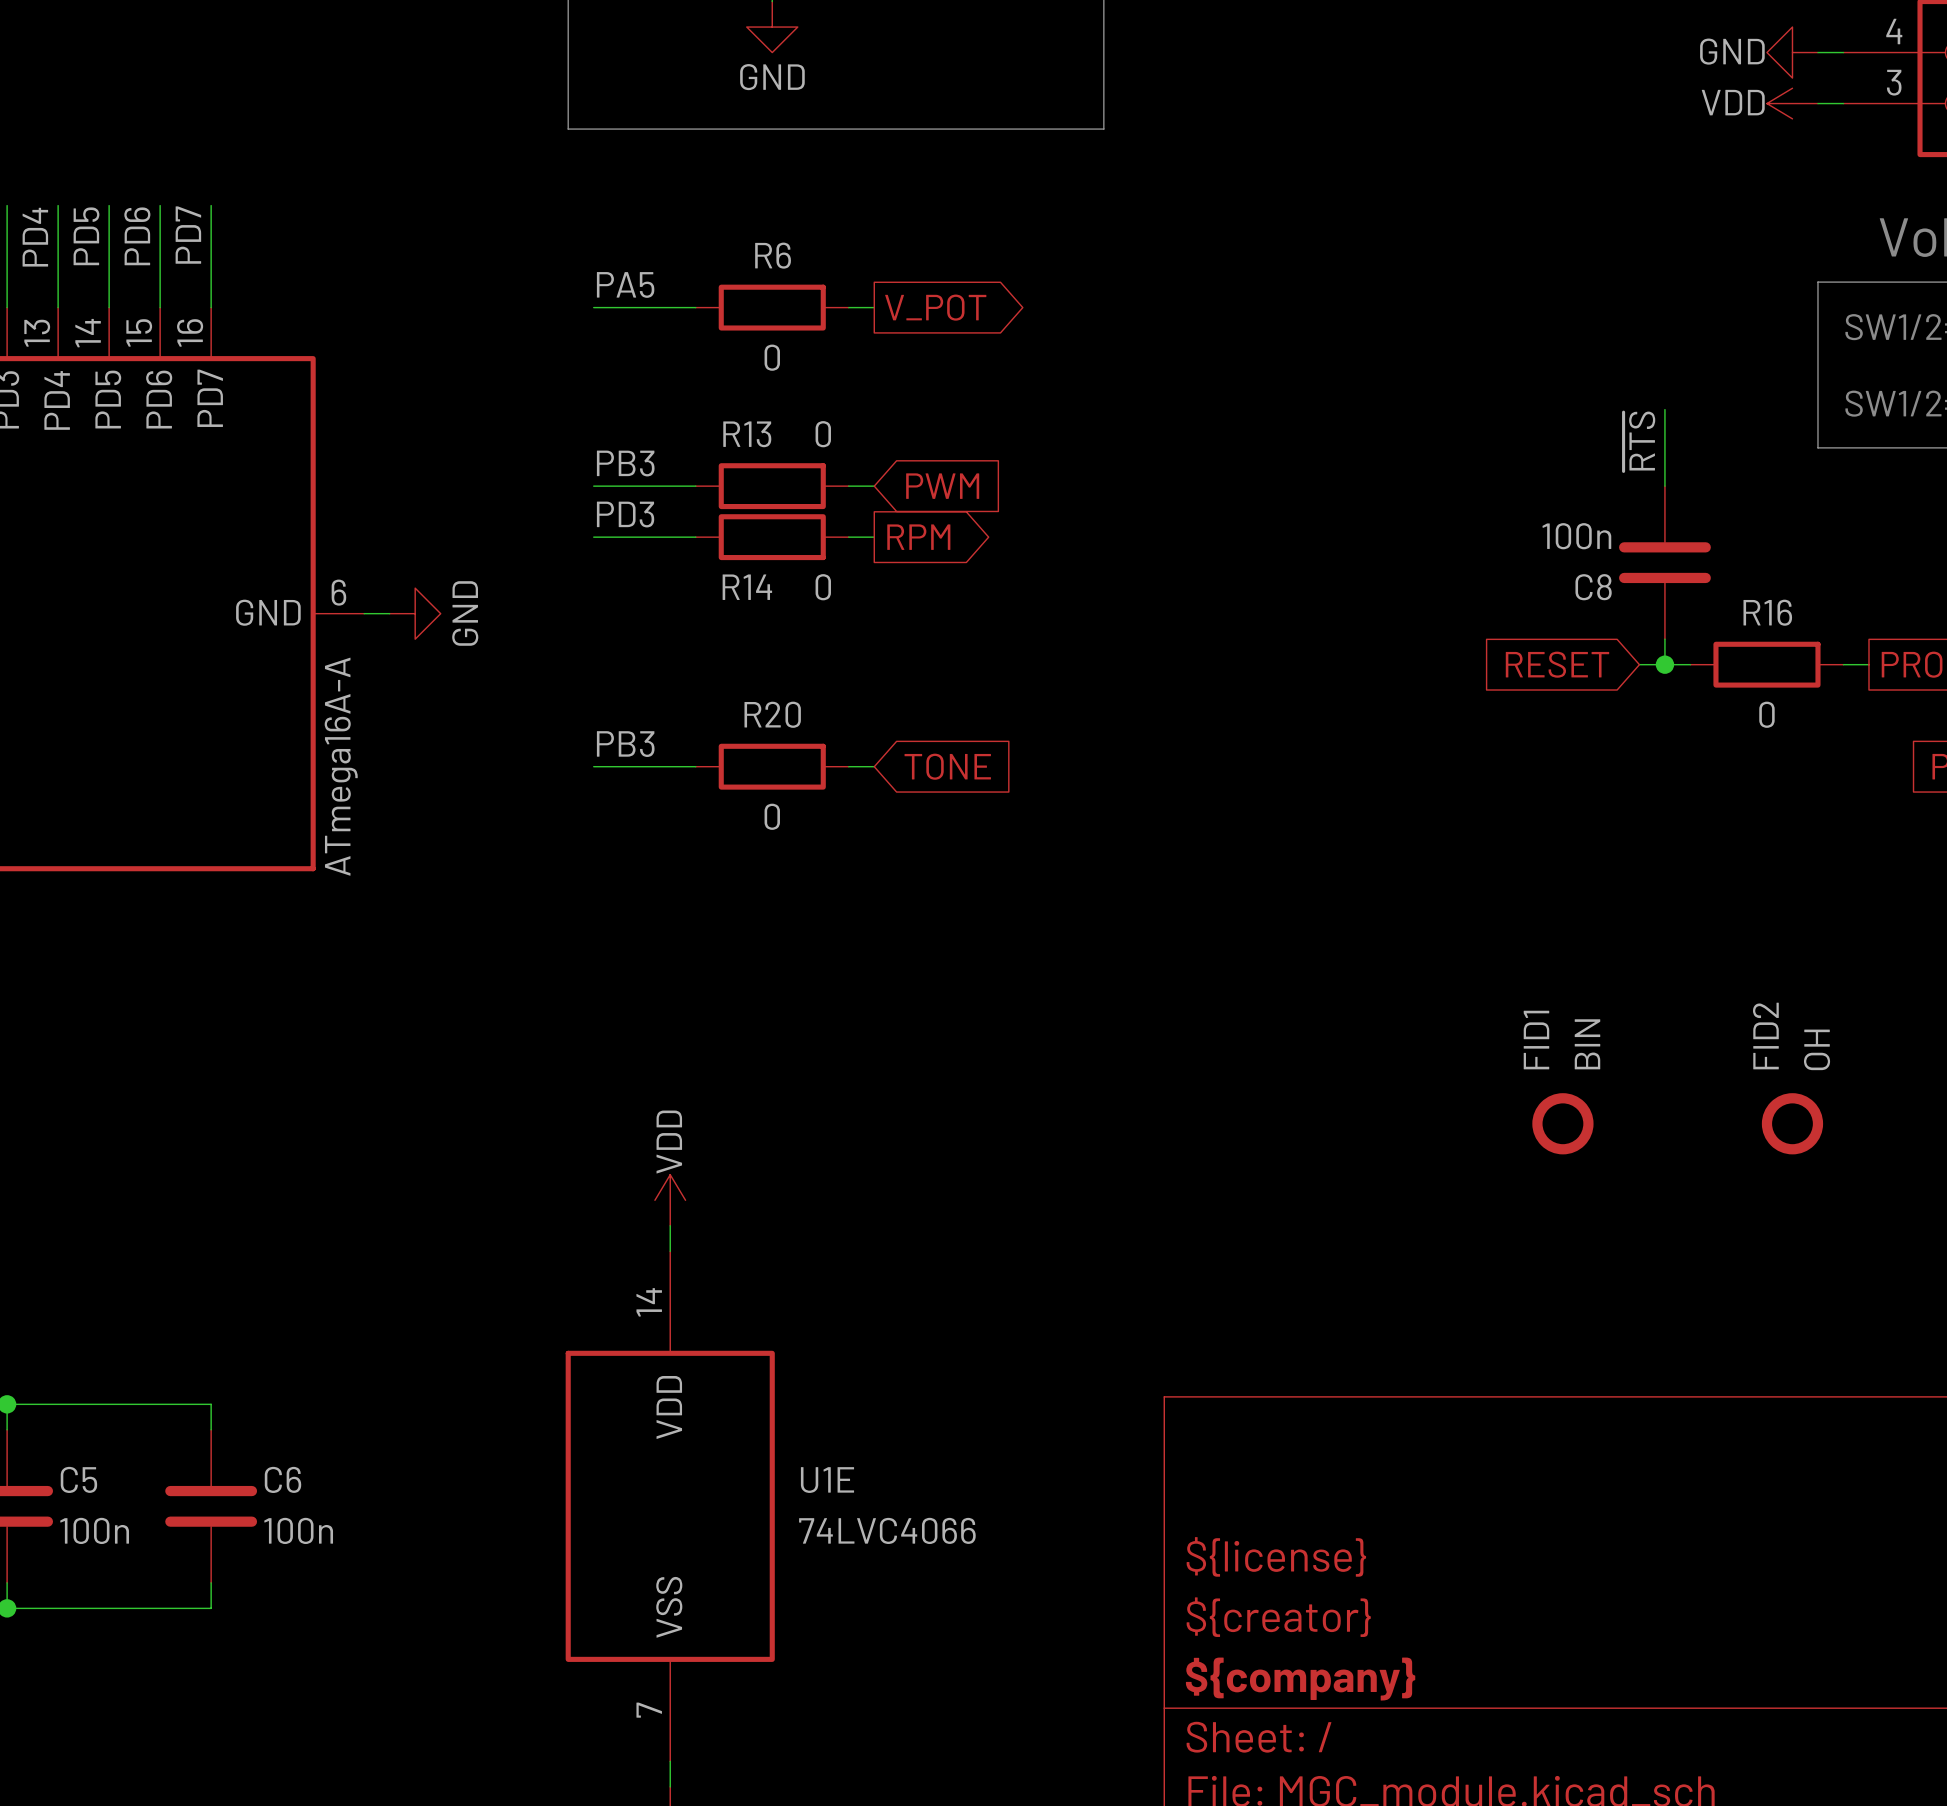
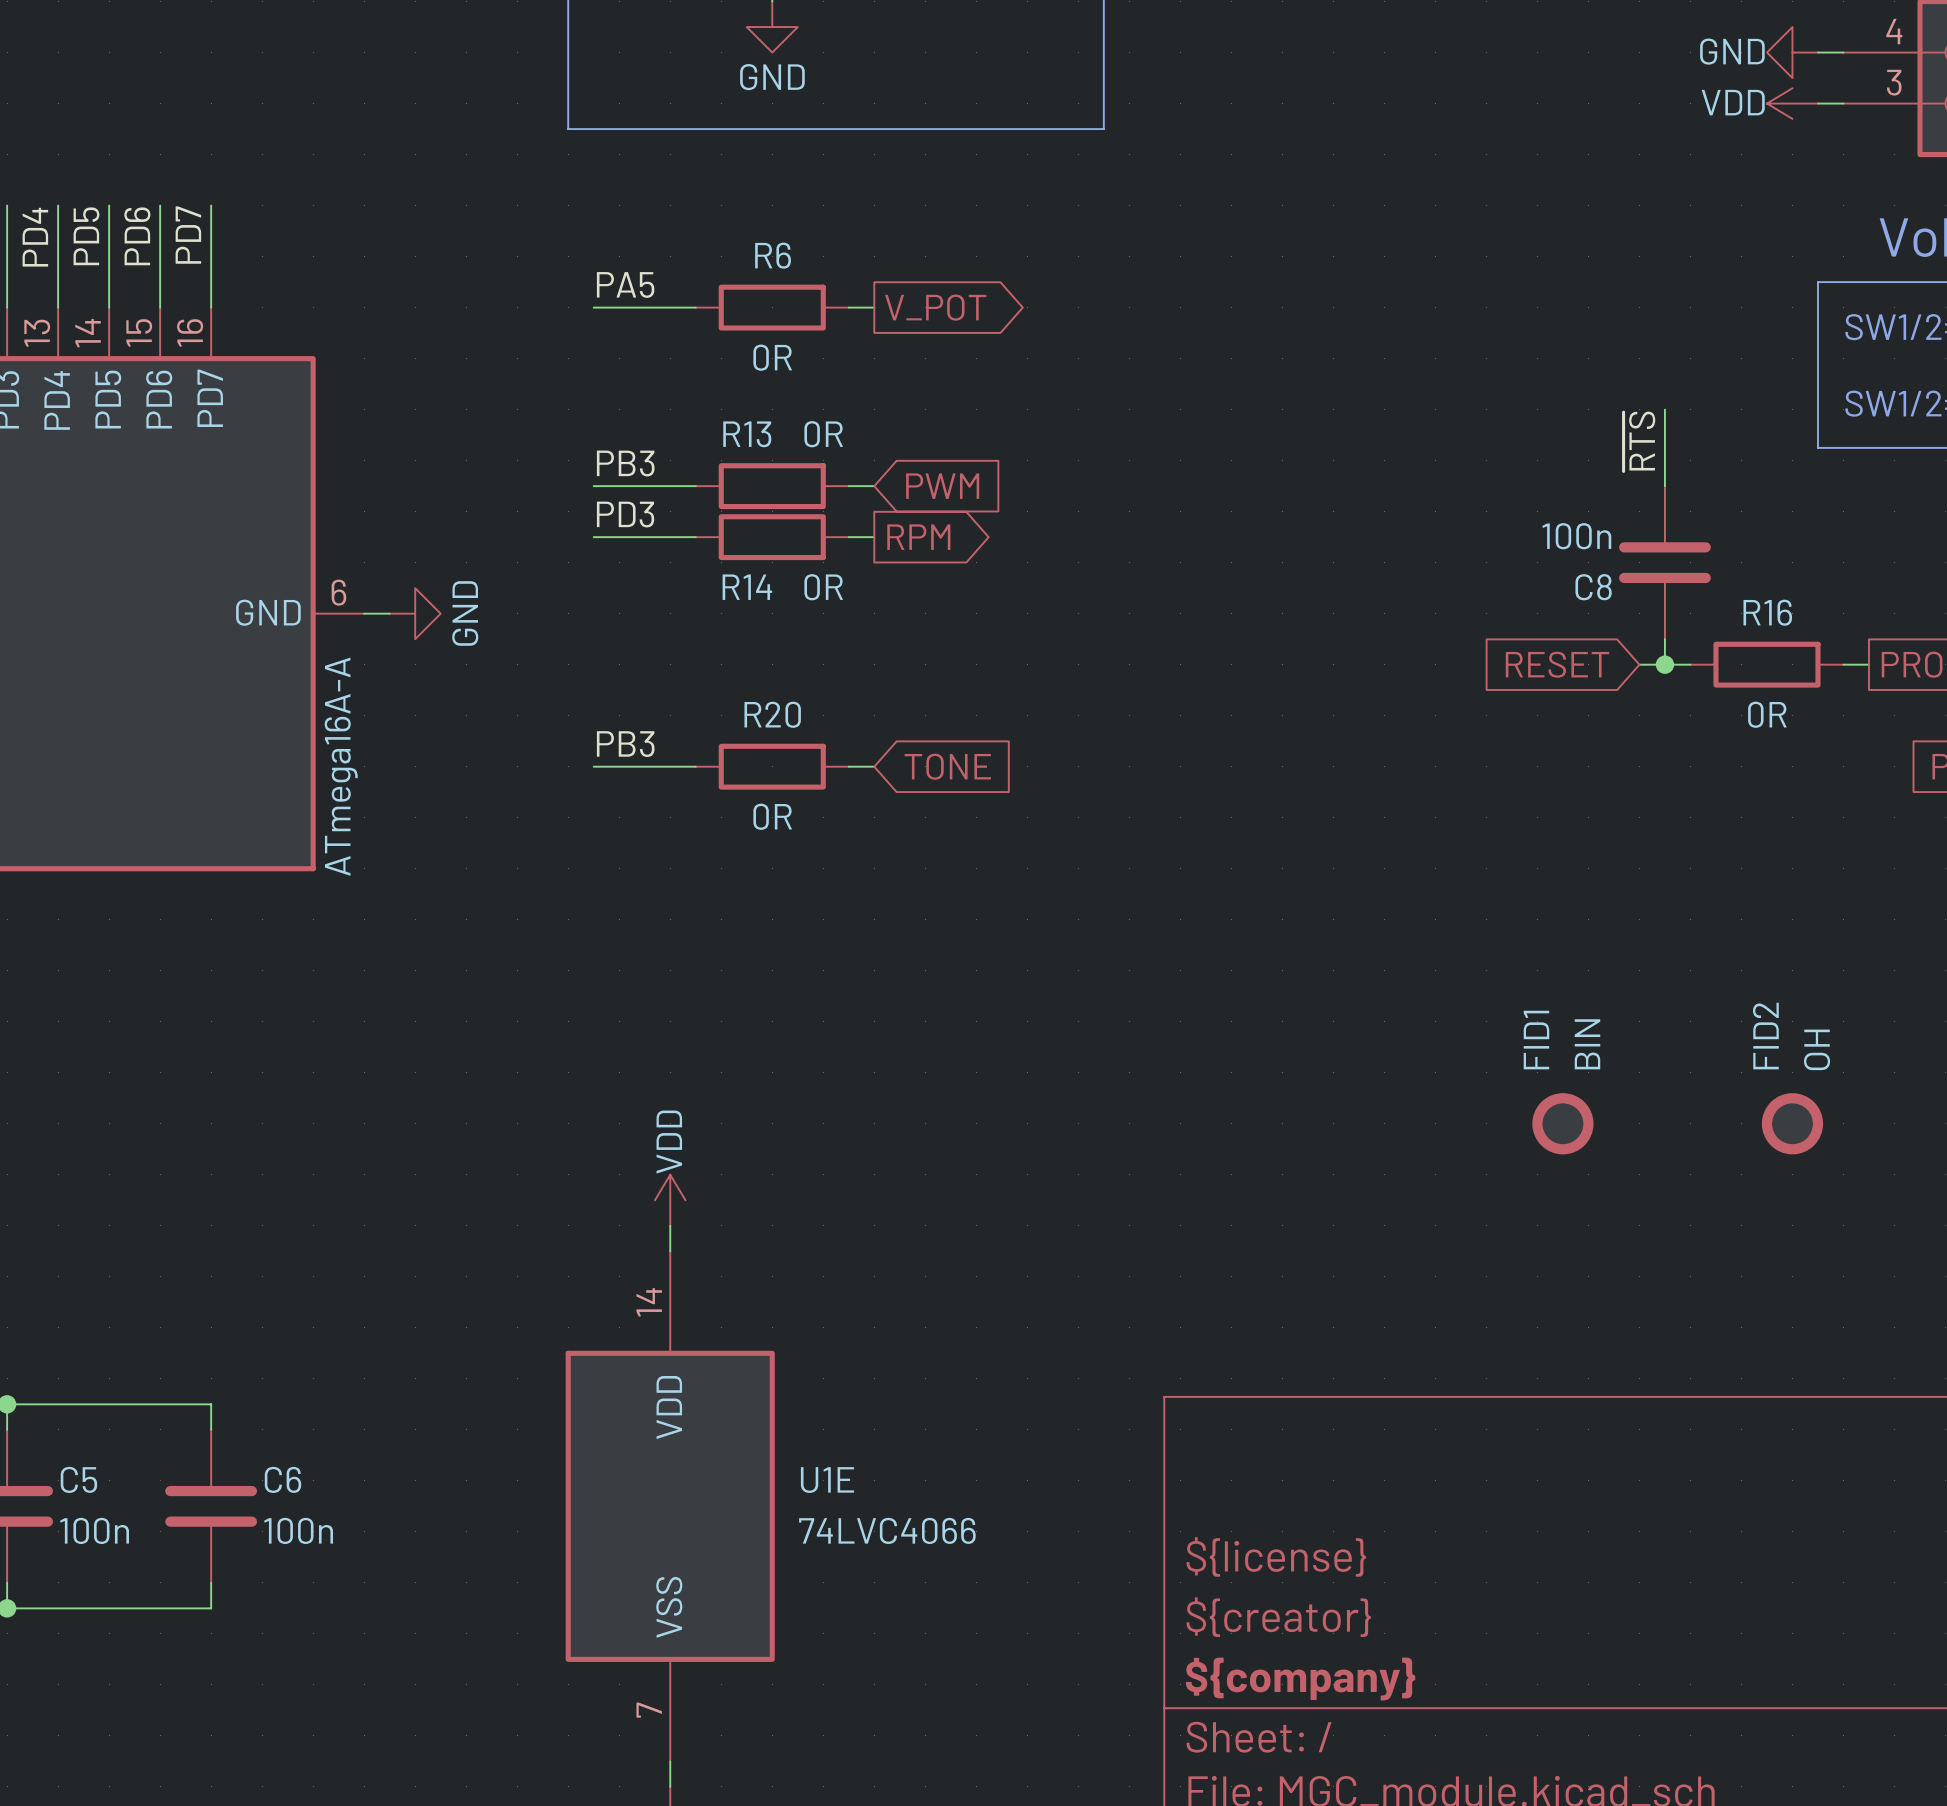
R6 value: 0 (772, 357) -> 0R (772, 357)
R13 value: 0 (823, 434) -> 0R (823, 434)
R14 value: 0 (823, 587) -> 0R (823, 587)
R16 value: 0 (1766, 714) -> 0R (1767, 714)
R20 value: 0 (772, 816) -> 0R (772, 816)

